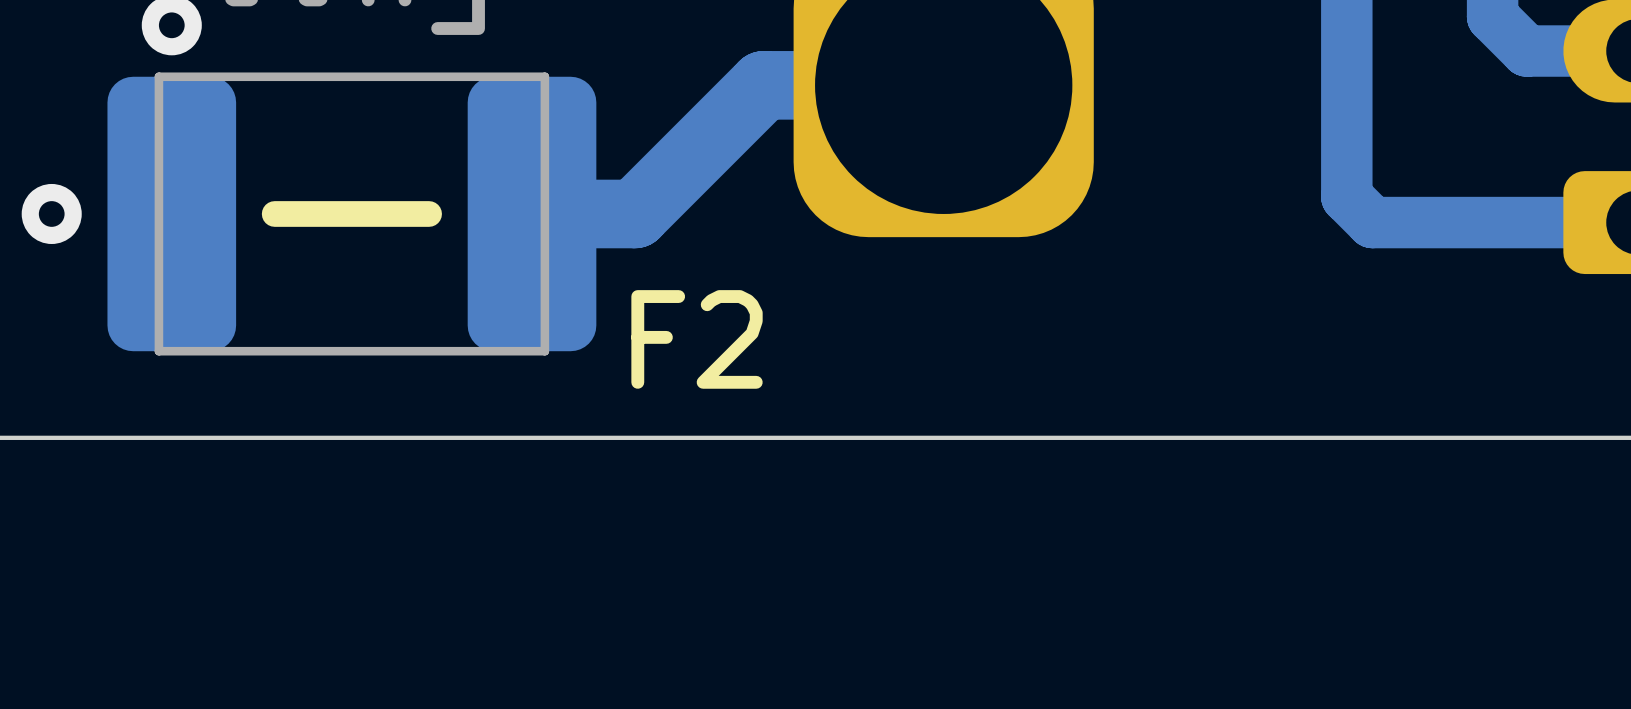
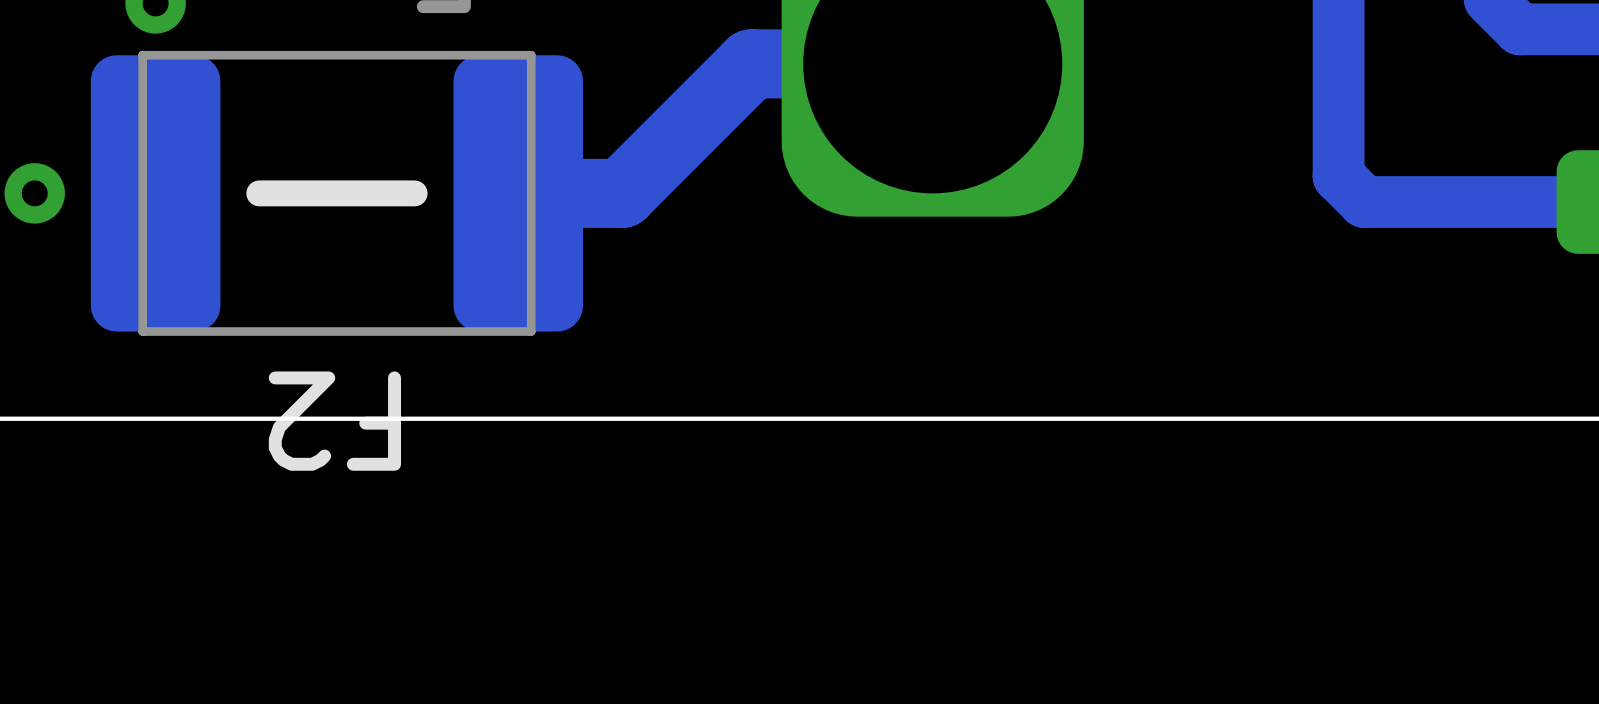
F2 name rotation: 0° (697, 339) -> 180° (334, 421)
F2 name position: F2 (697, 339) -> F2 (334, 421)

